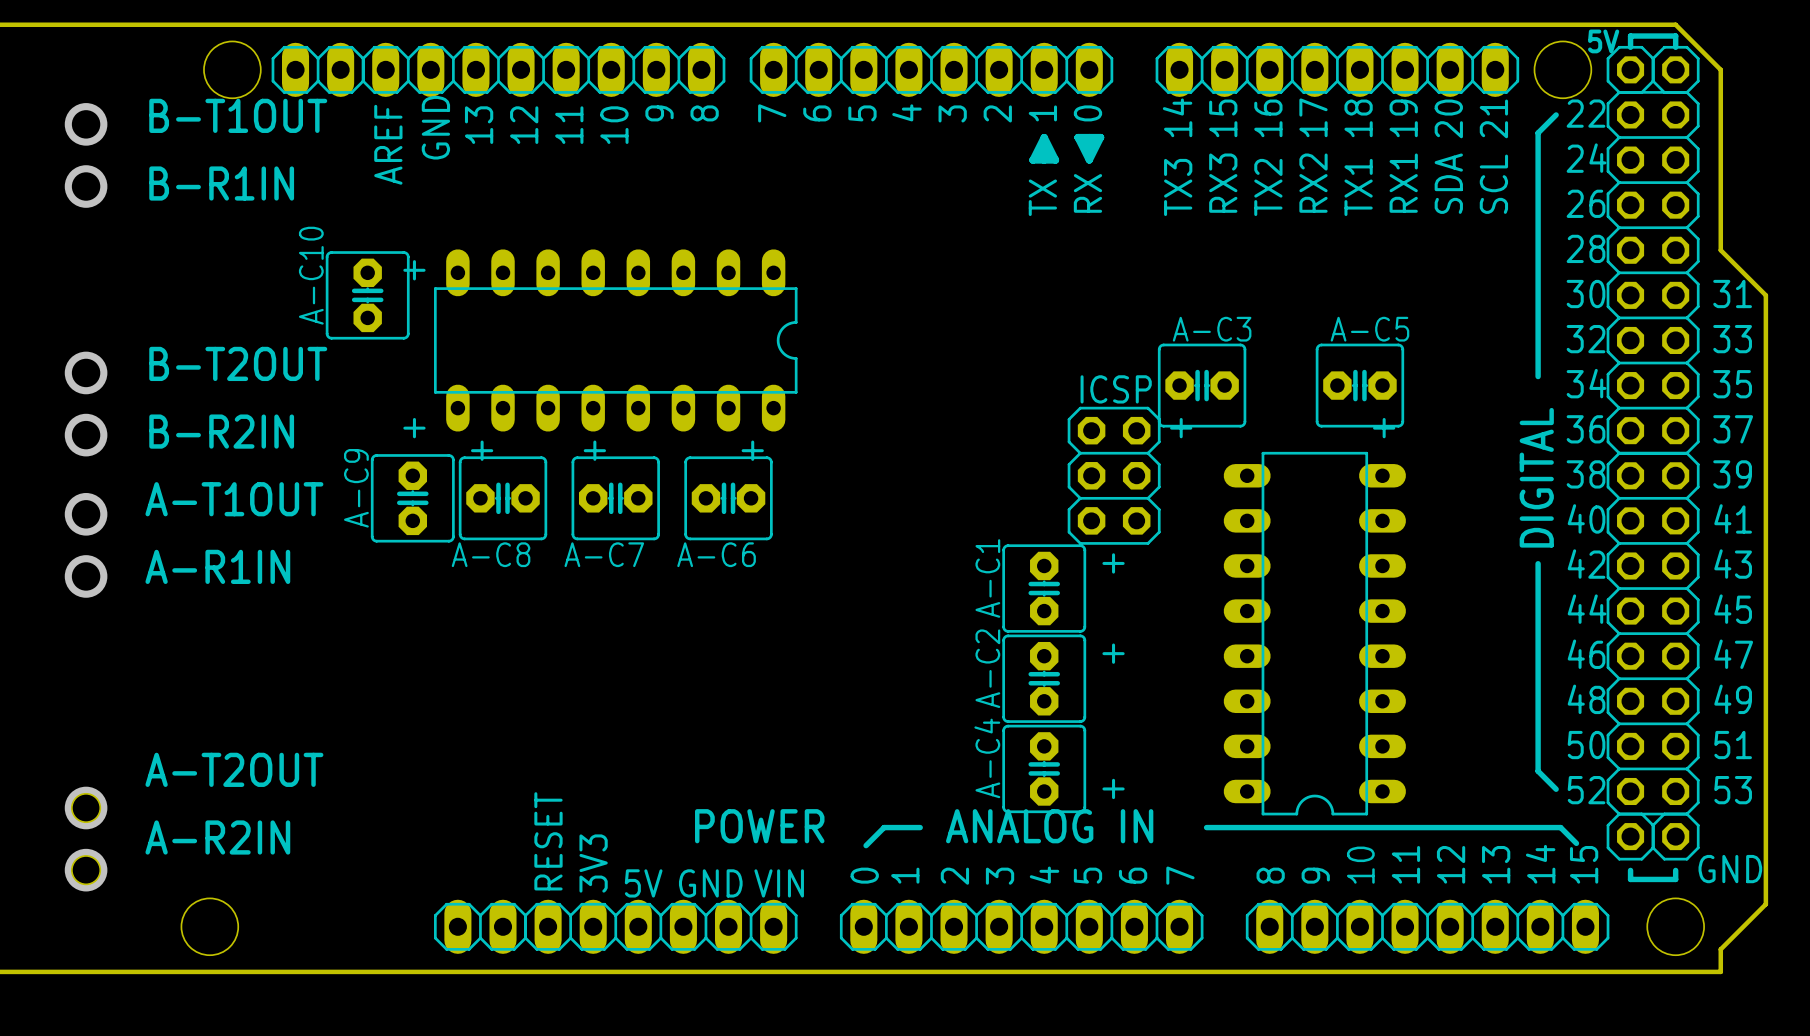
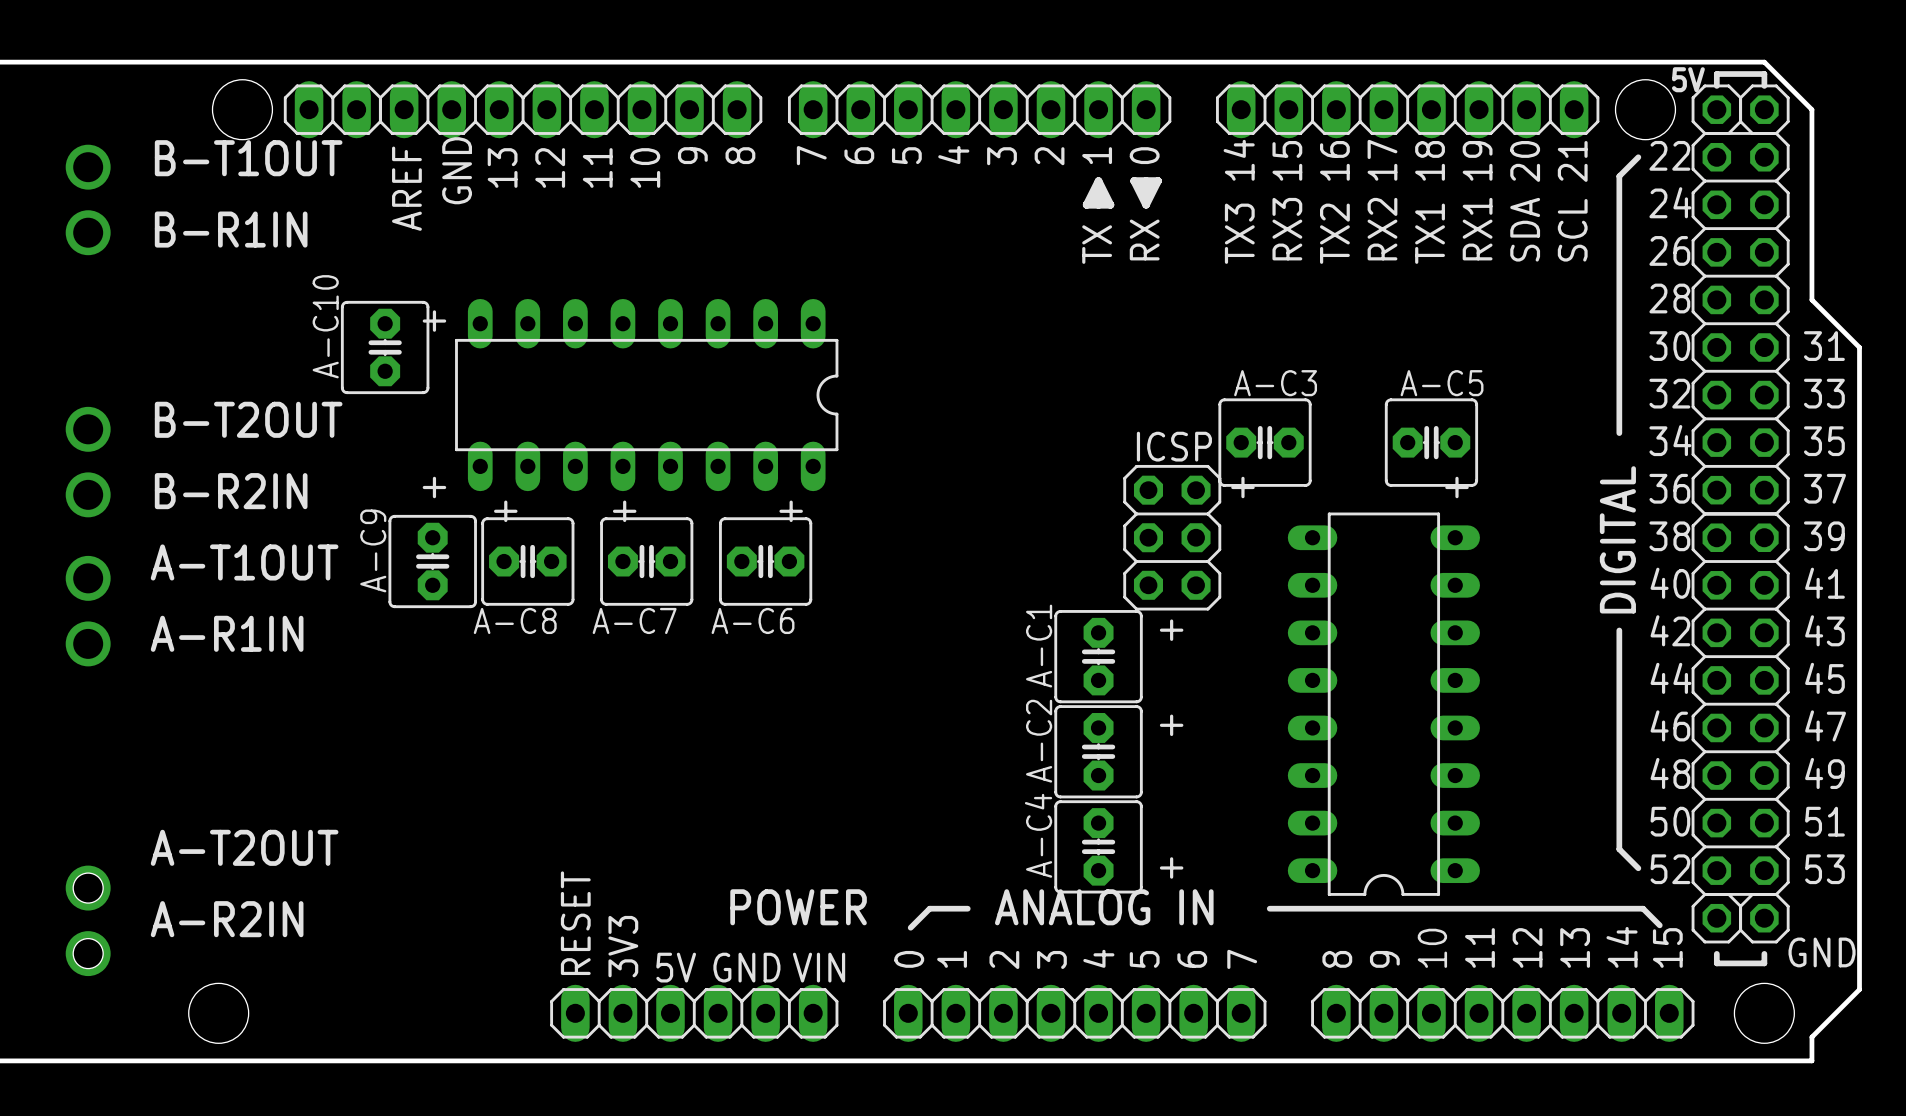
part: (480, 926) -> none

